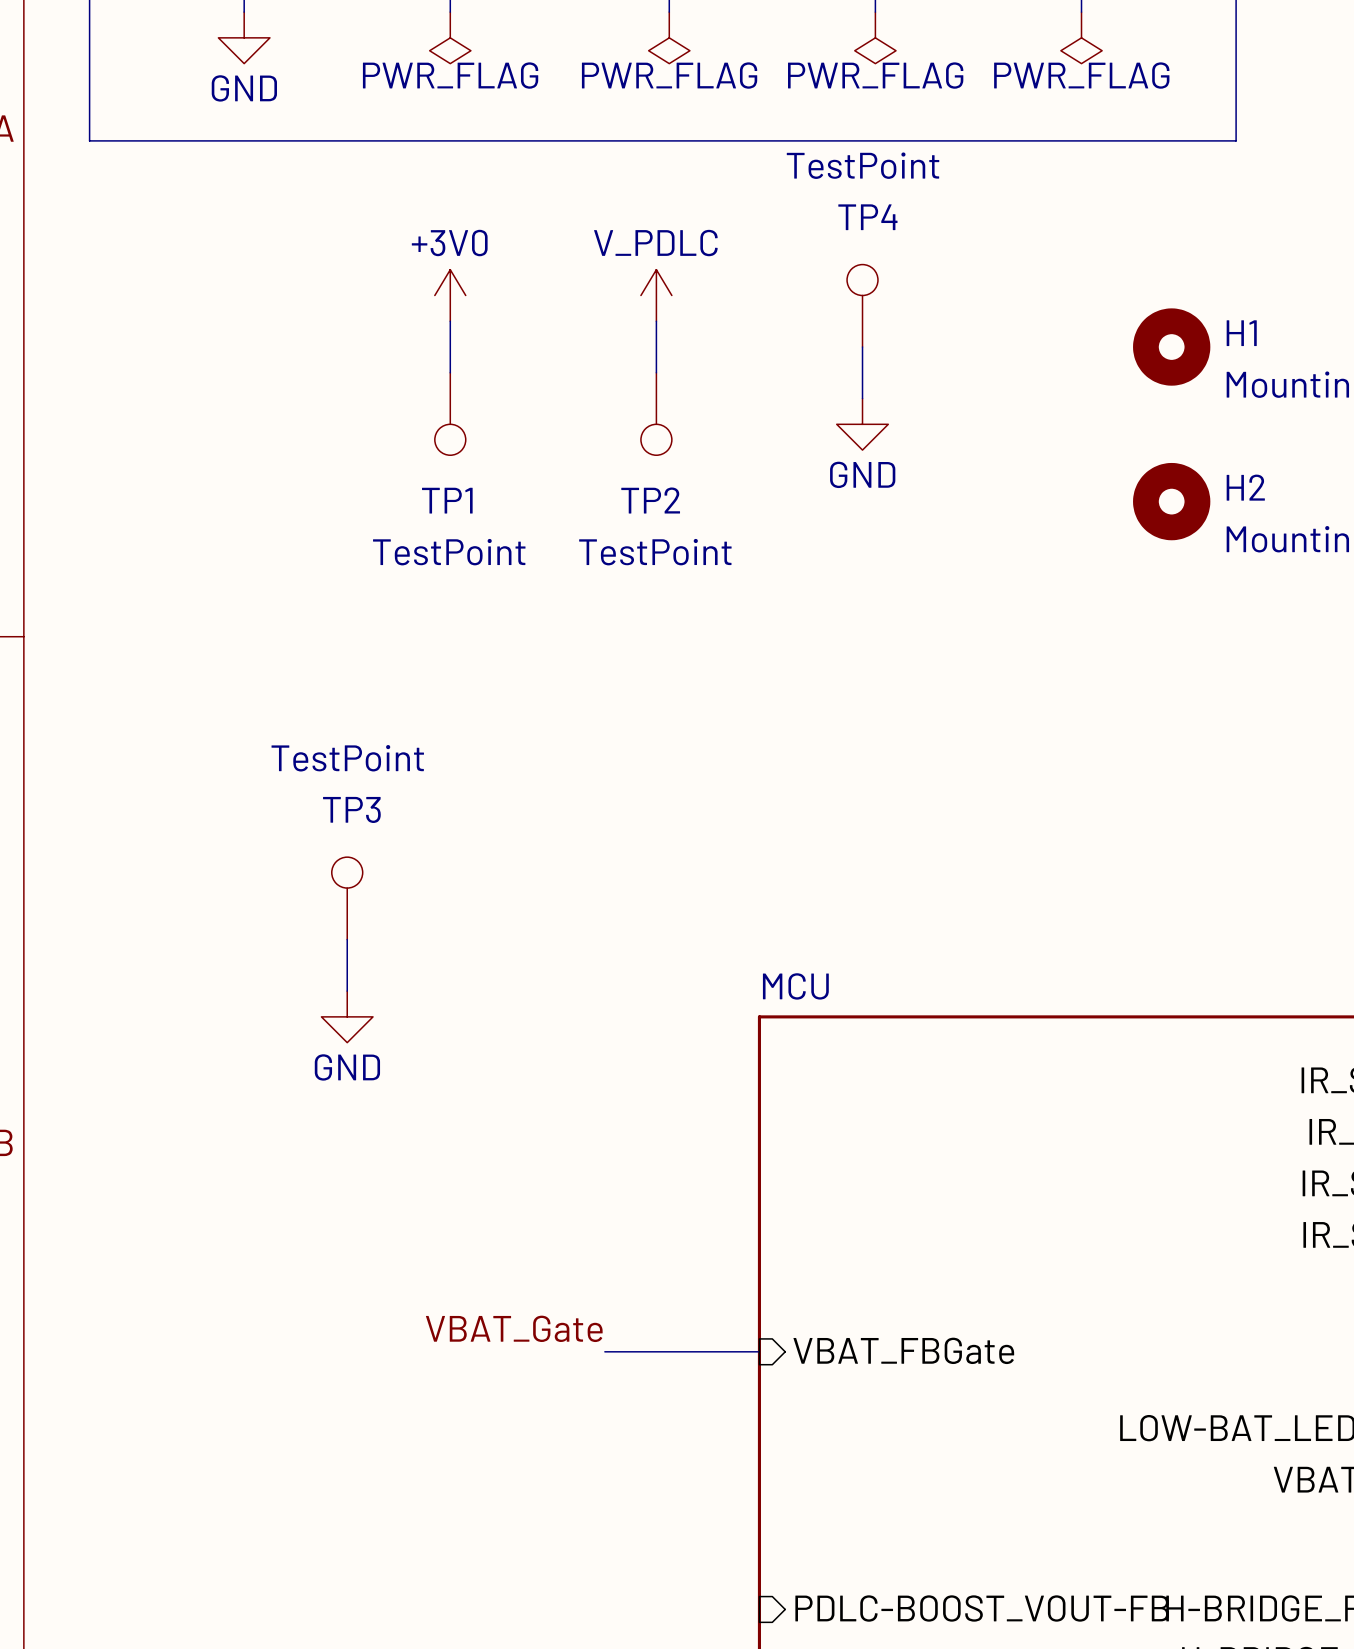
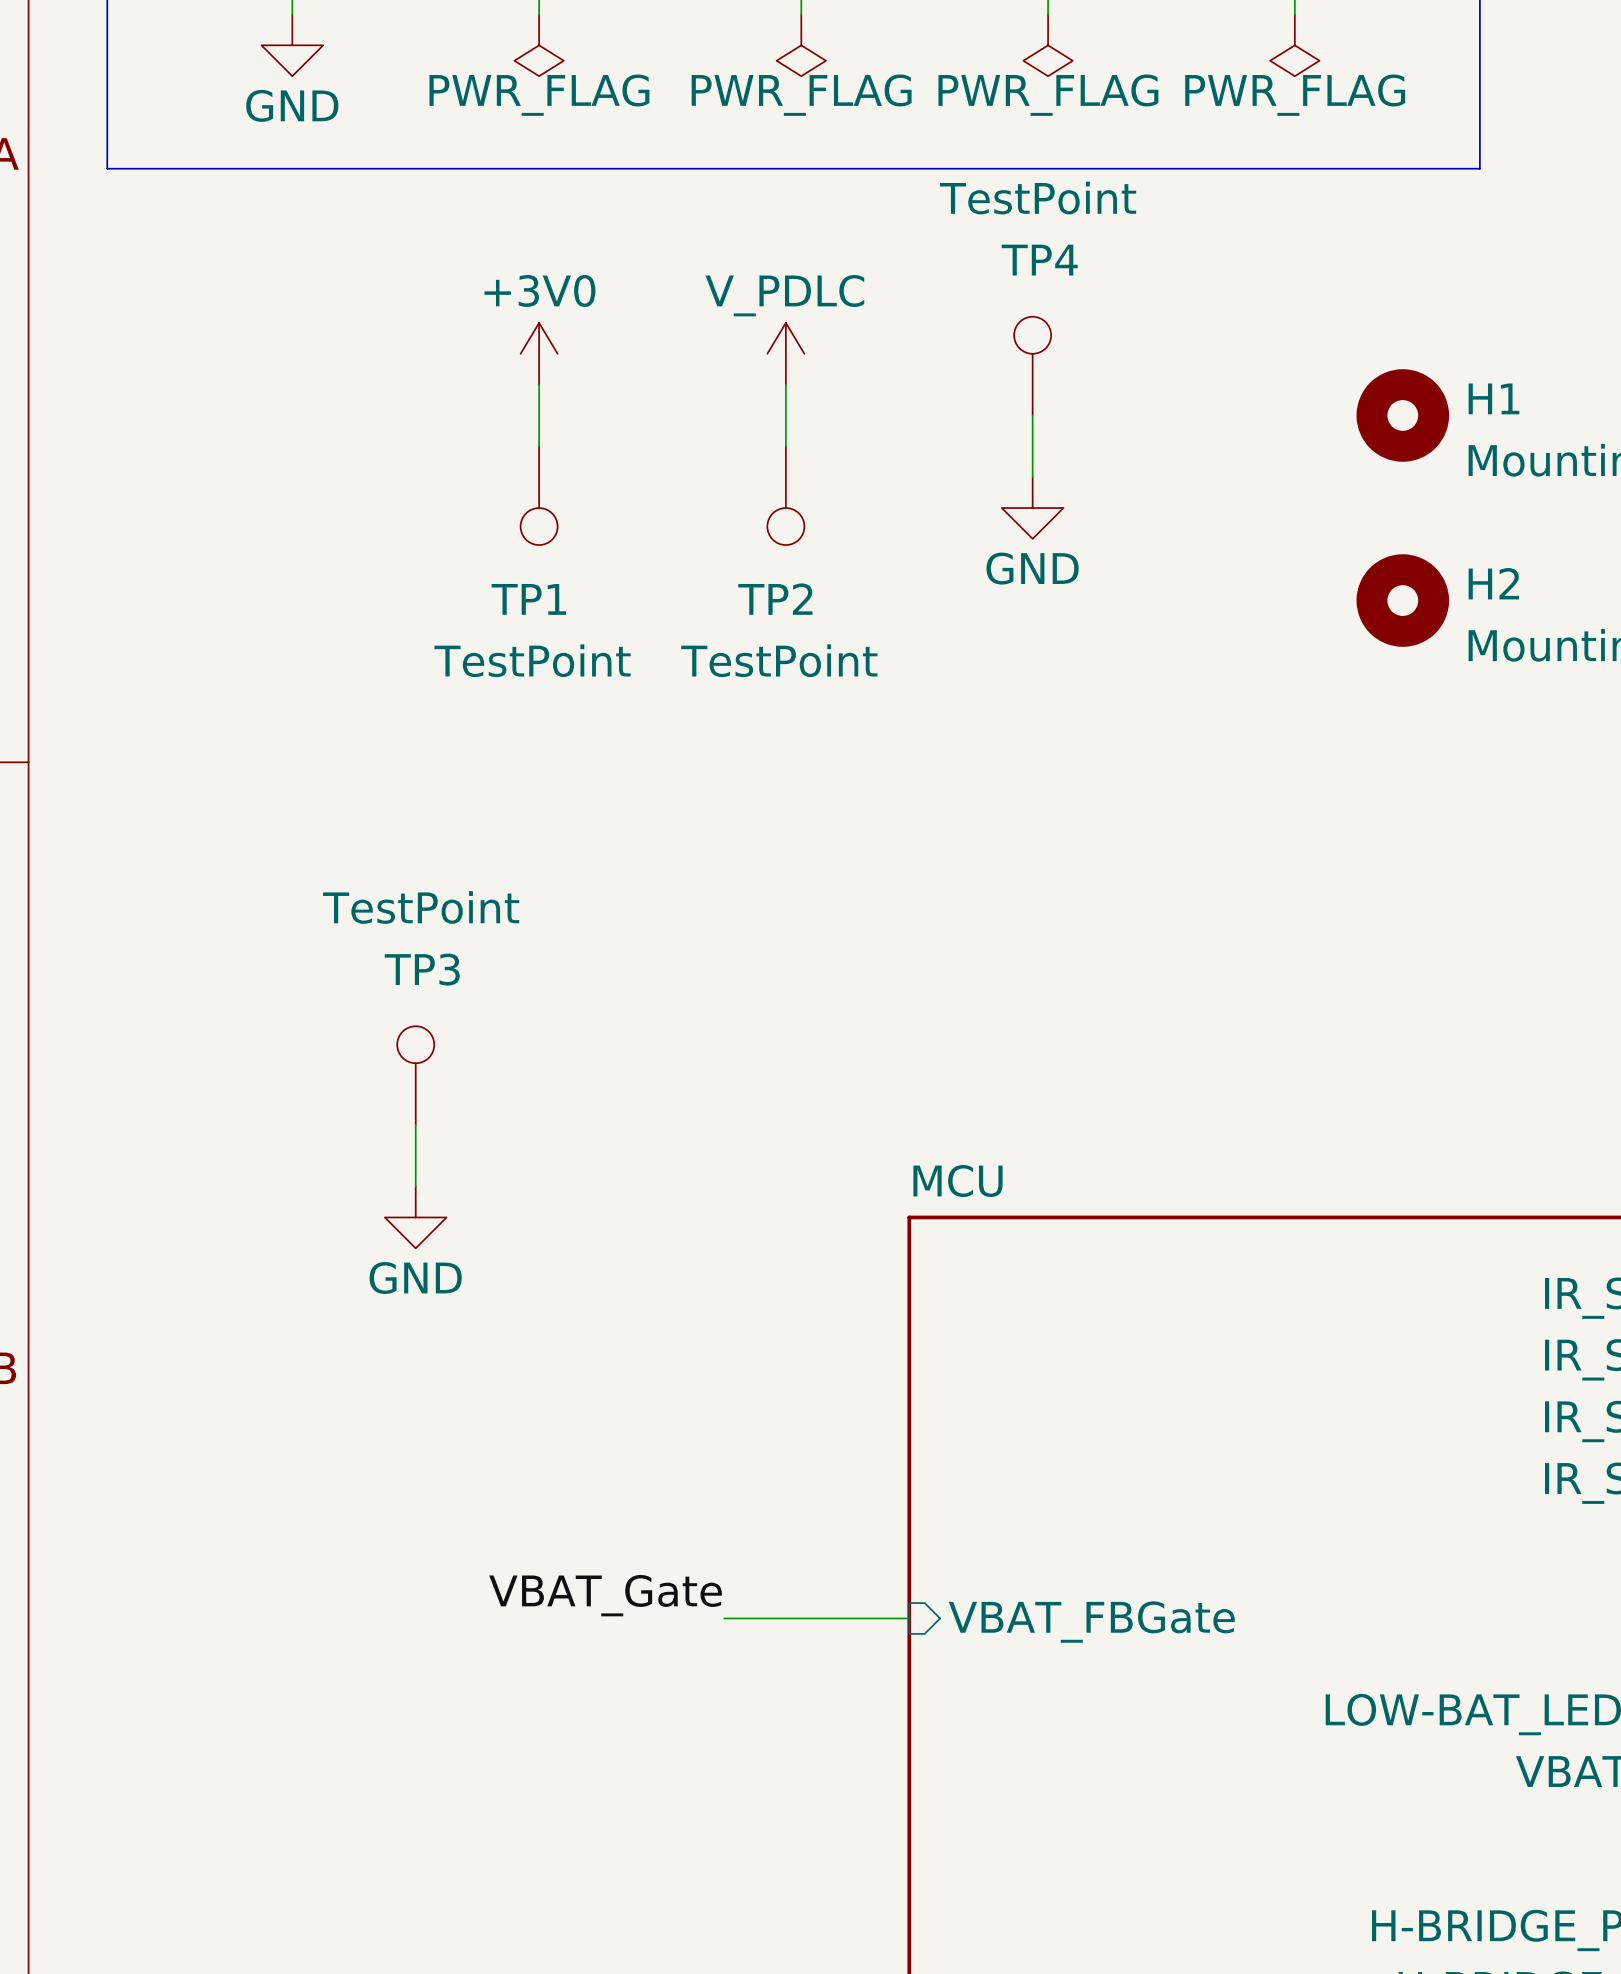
sheet pin: PDLC-BOOST_VOUT-FB (982, 1608) -> none

